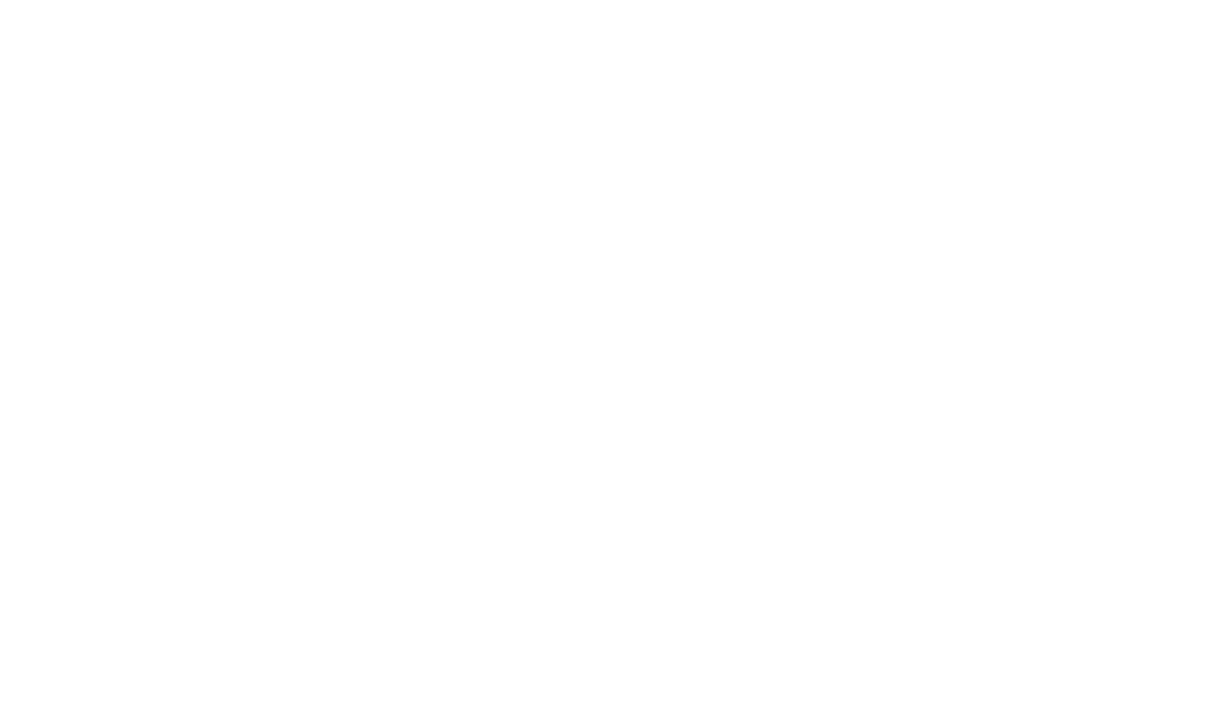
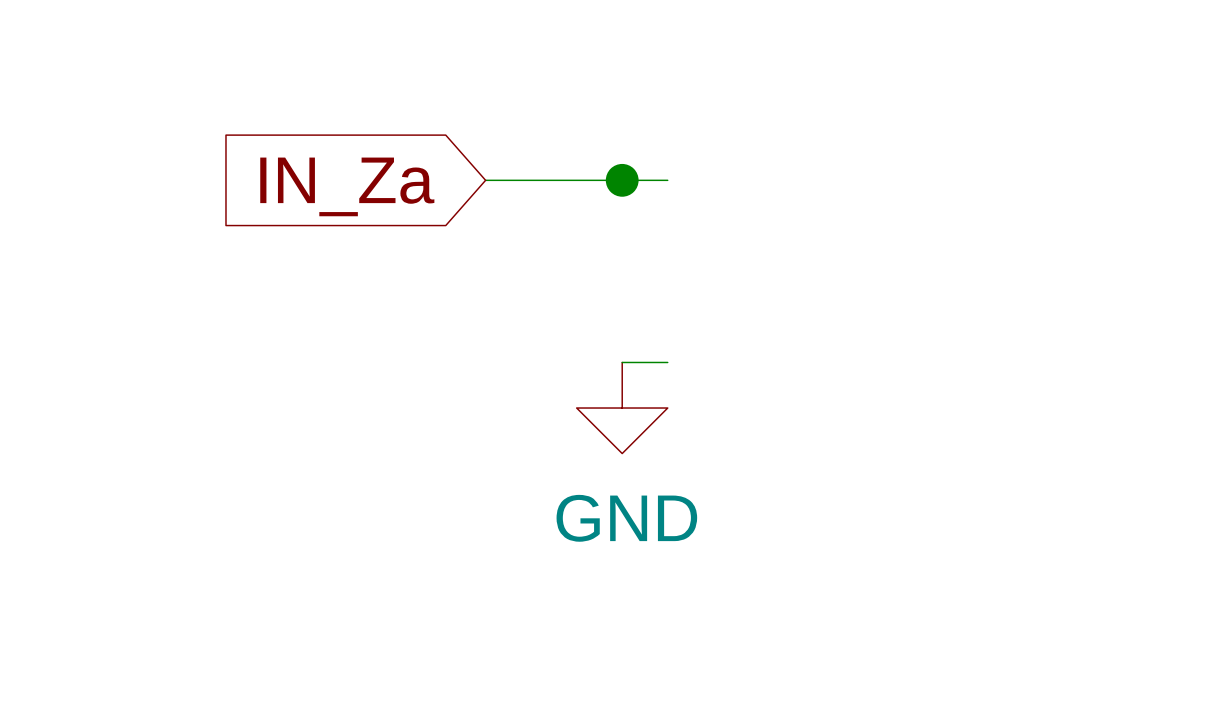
wire: none -> (485, 180) (667, 180)
junction: none -> (622, 180)
global label: none -> IN_Za (347, 186)
wire: none -> (622, 362) (667, 362)
power symbol: none -> GND (622, 408)

